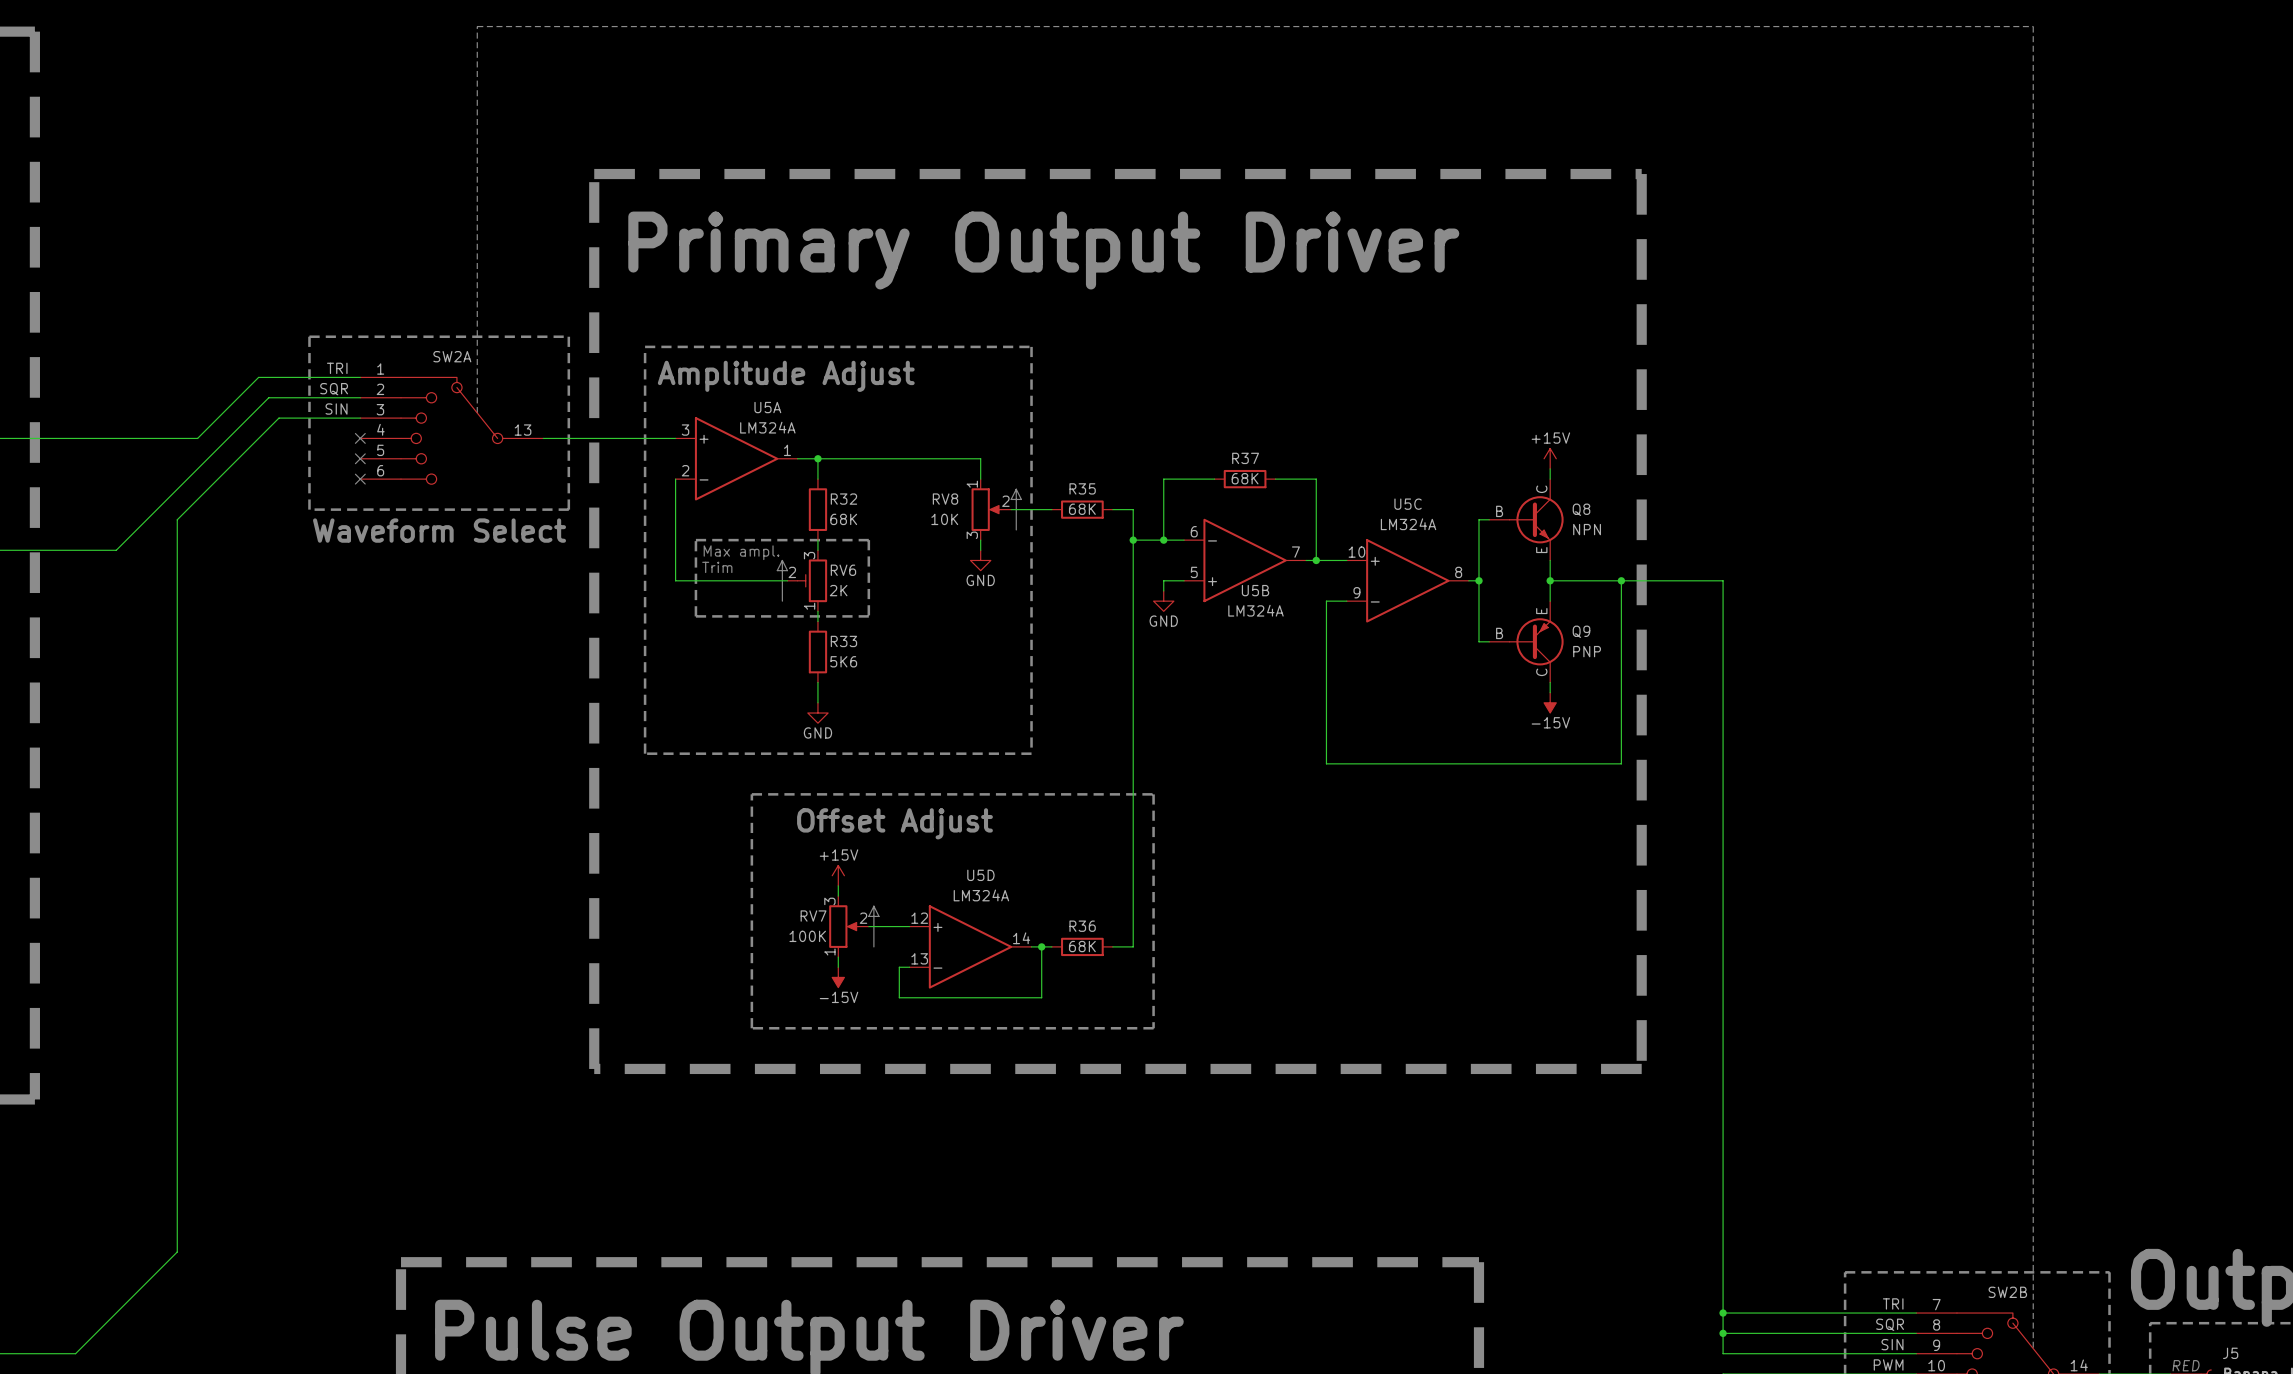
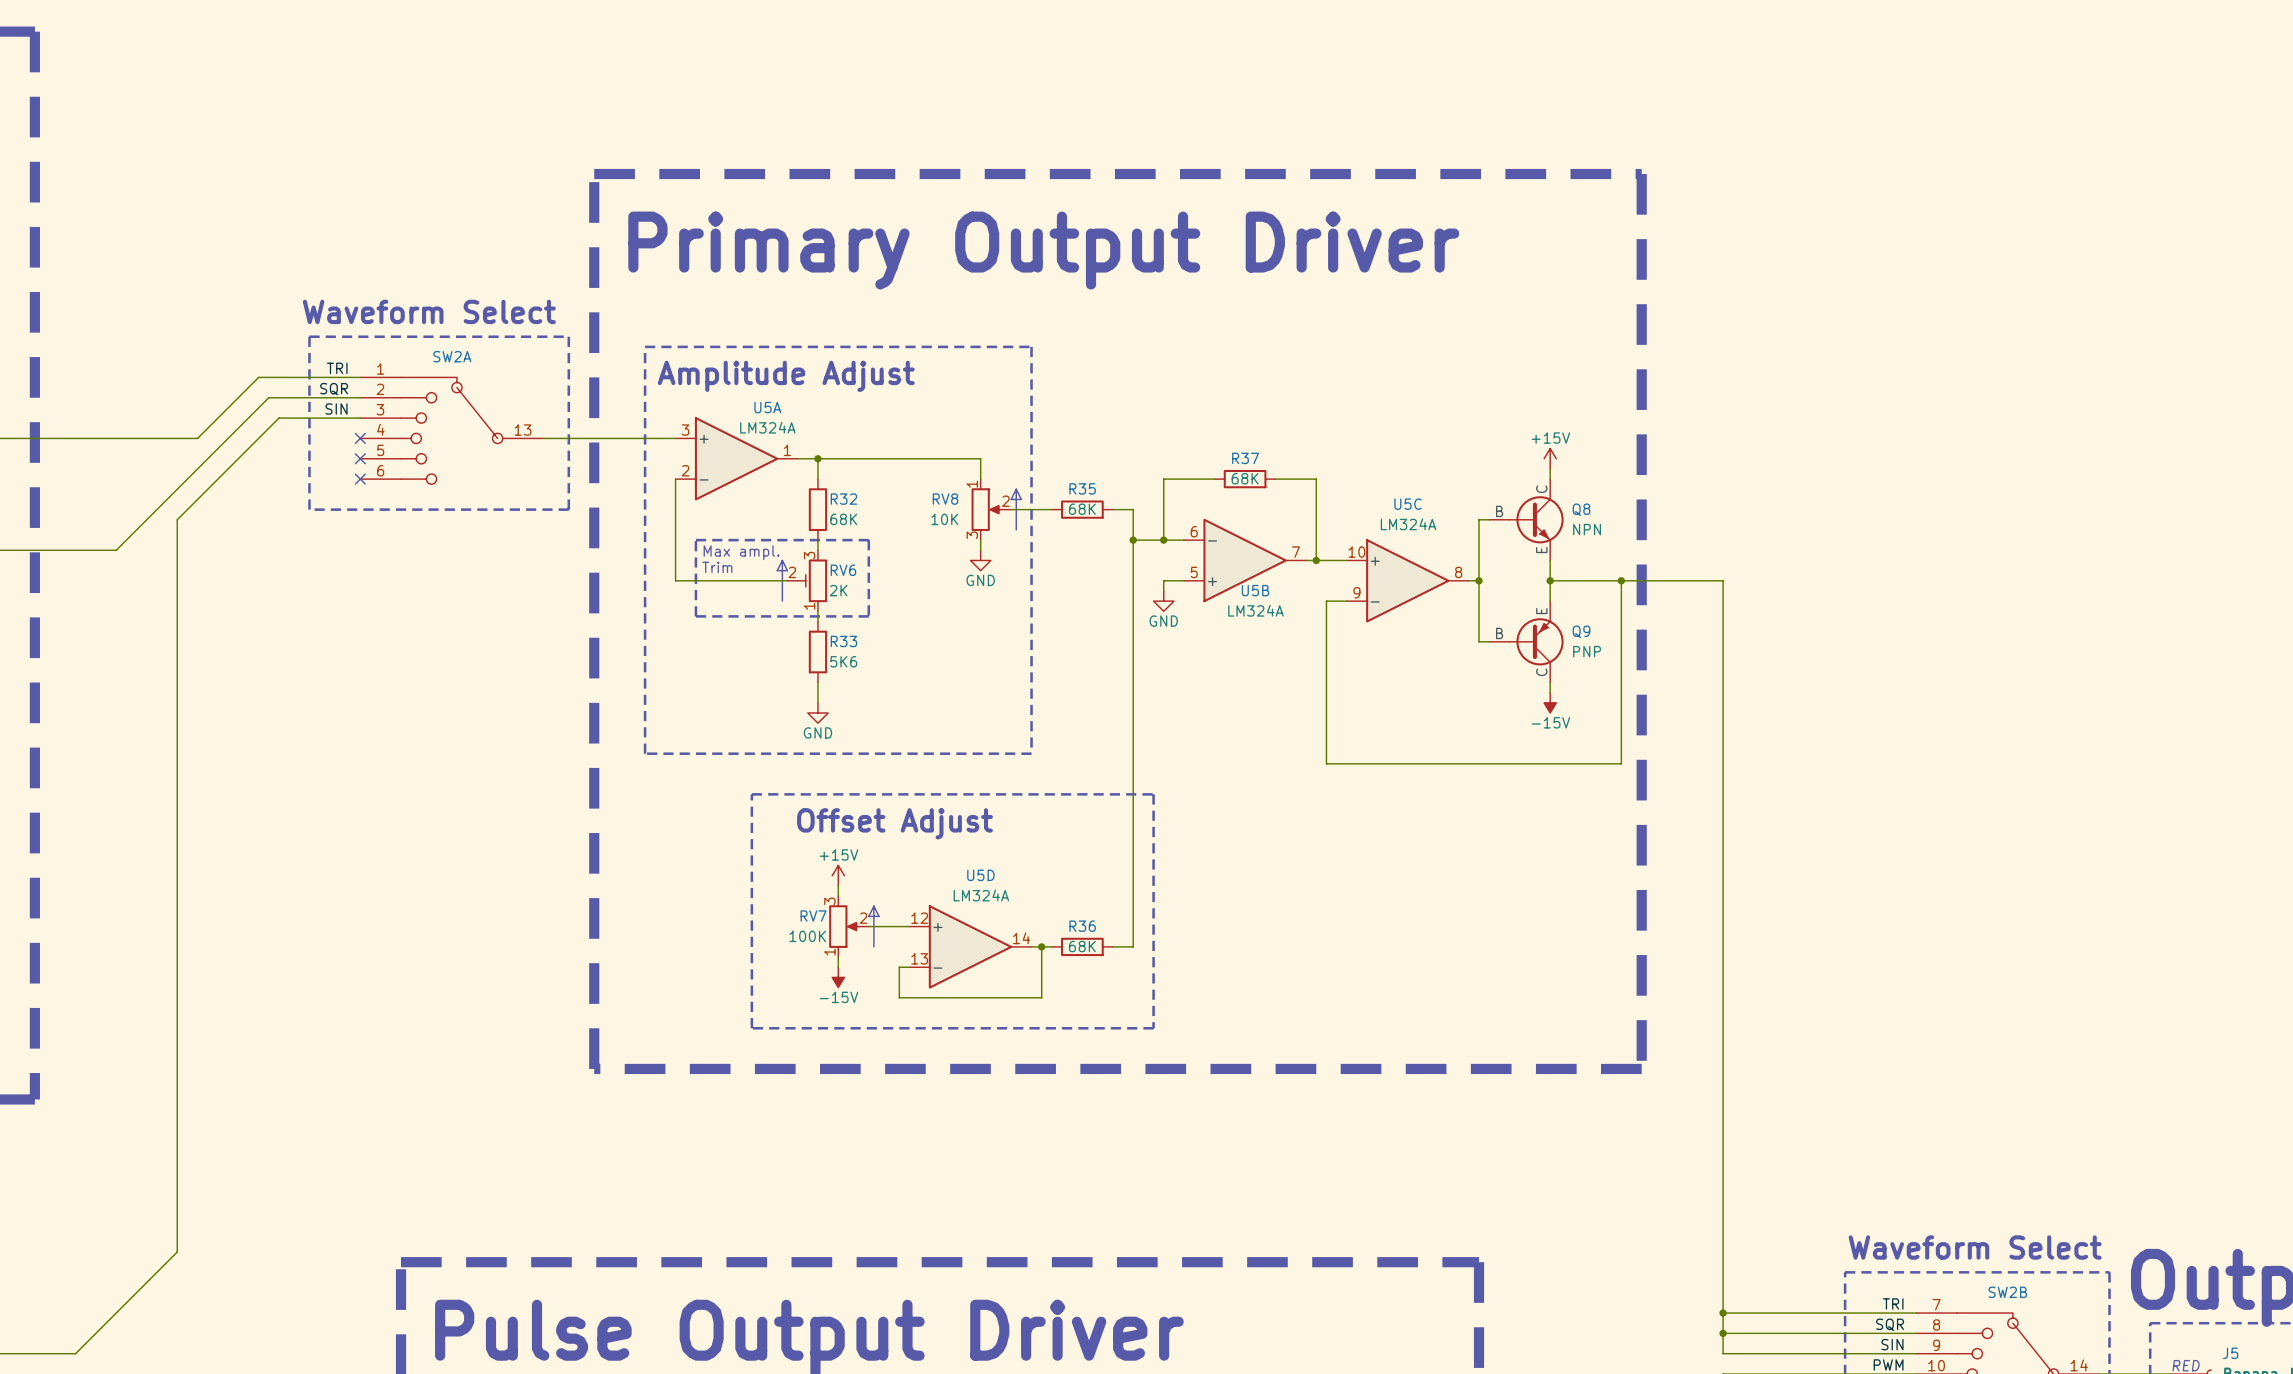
text: none -> Waveform Select (429, 311)
line: (477, 413) (477, 26) (2033, 26) (2033, 1348) -> none
text: Waveform Select (439, 530) -> none
text: none -> Waveform Select (1975, 1247)

